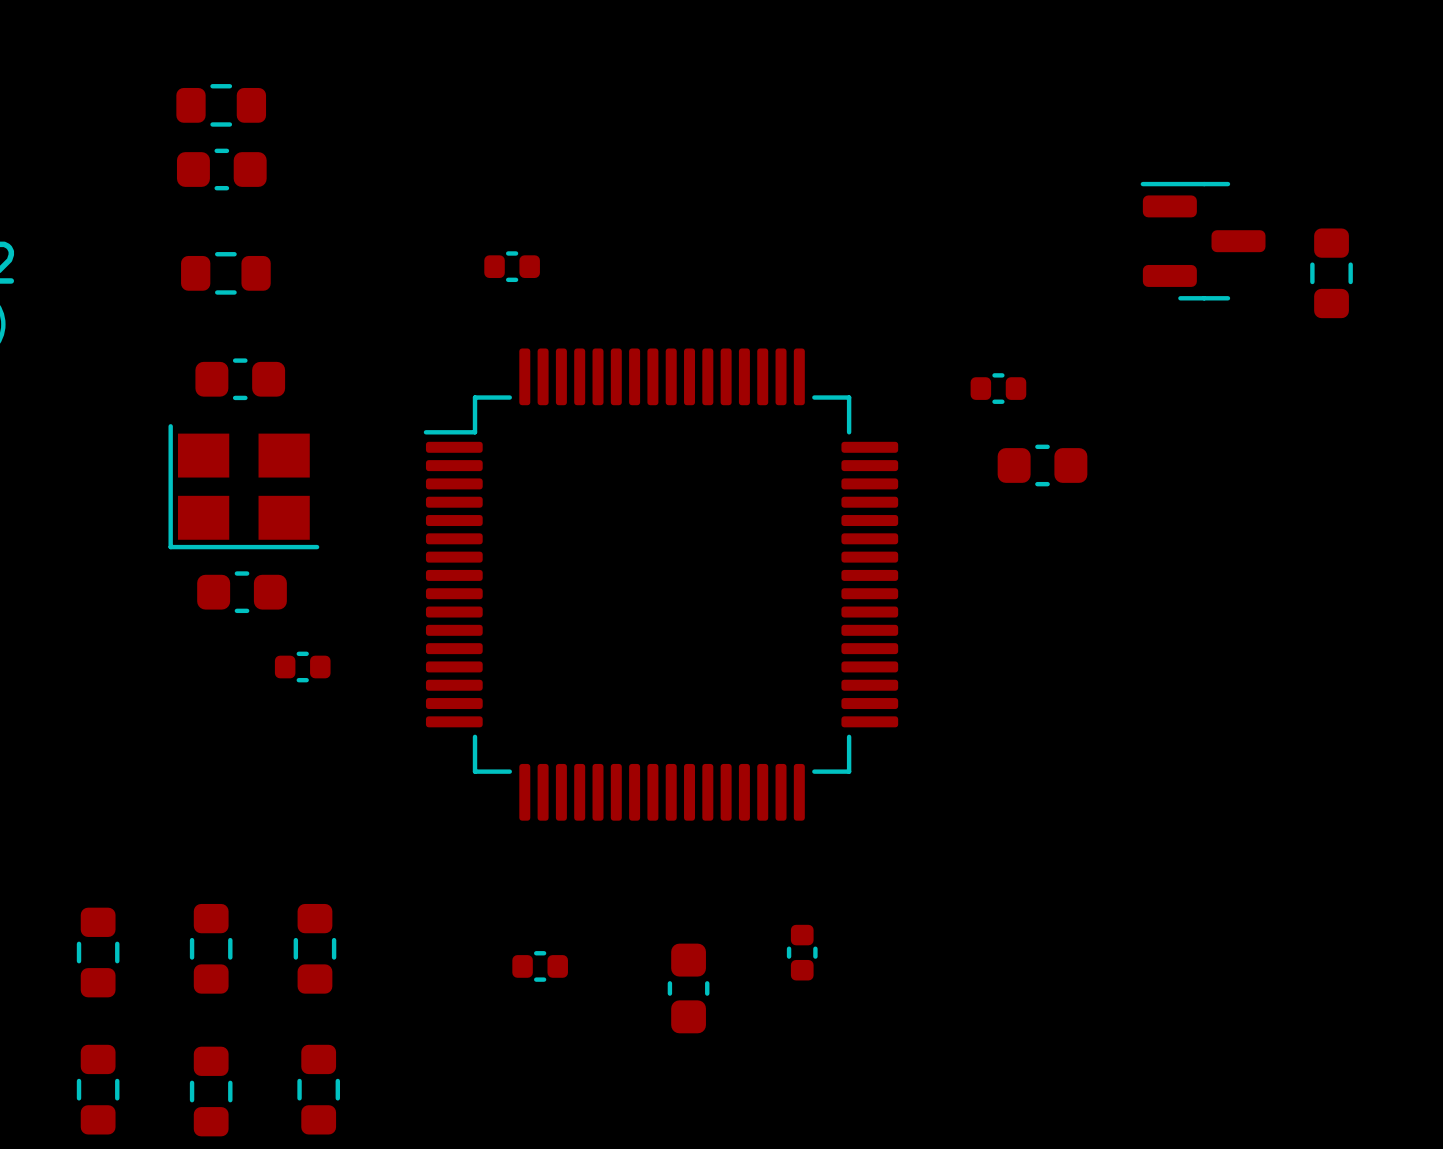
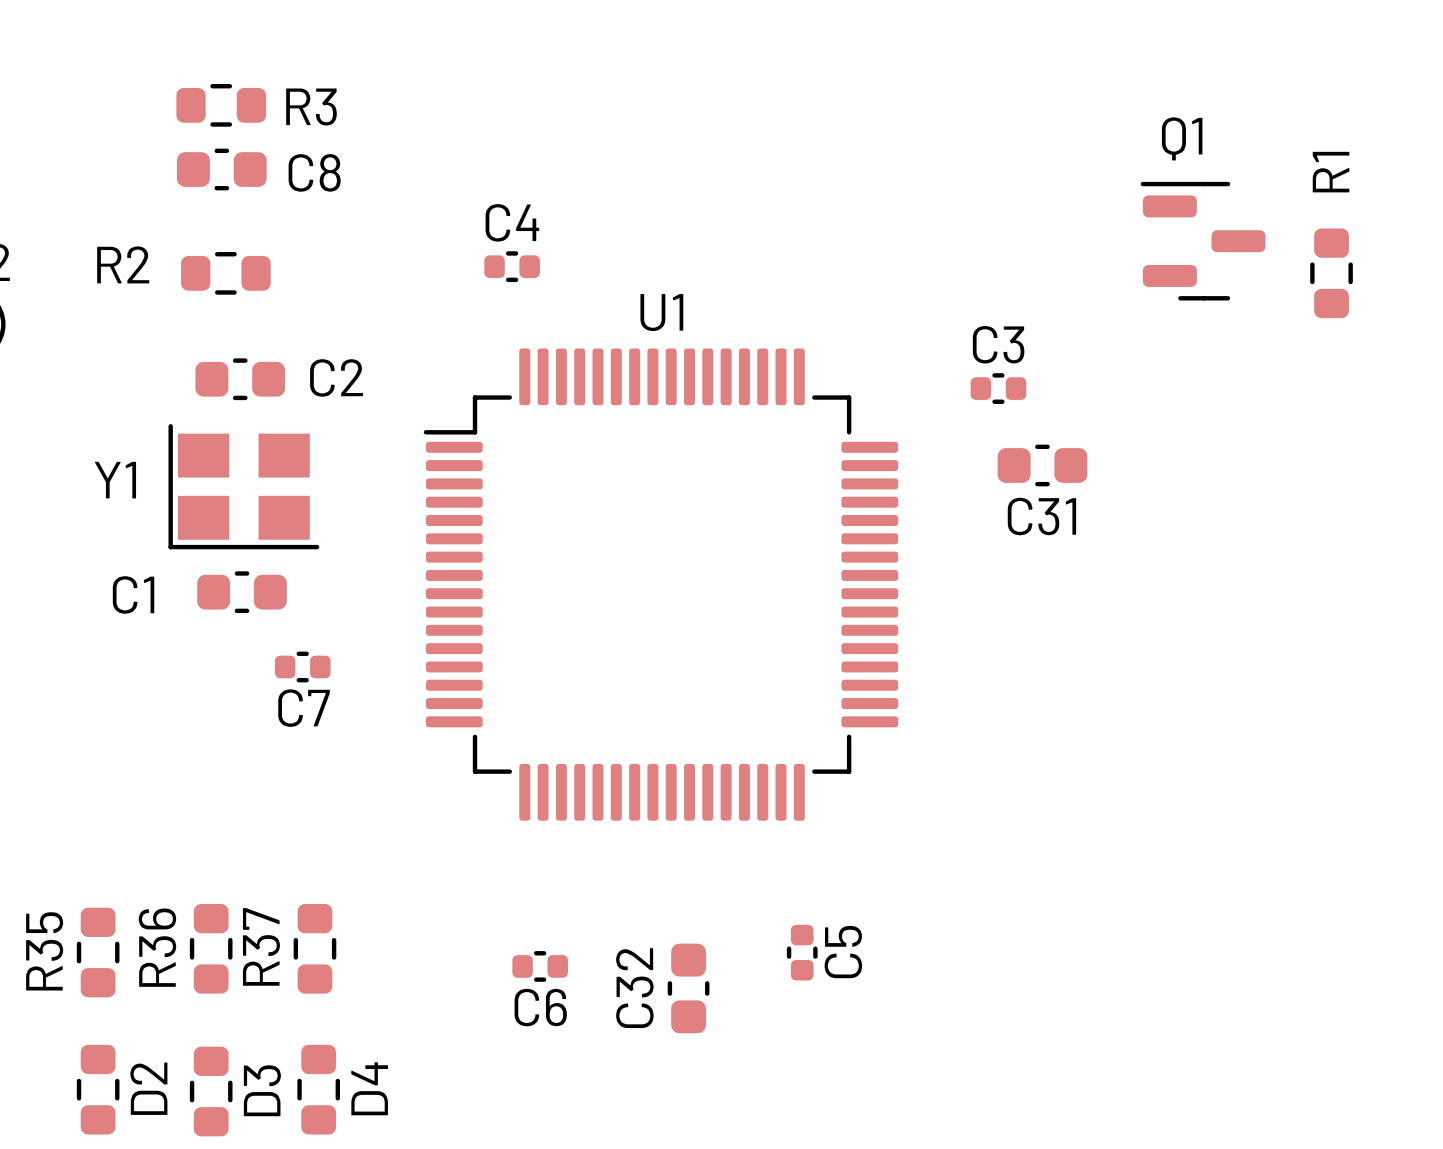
R3 name: none -> R3 (311, 107)
Q1 name: none -> Q1 (1182, 138)
R1 name: none -> R1 (1331, 172)
C8 name: none -> C8 (314, 172)
C4 name: none -> C4 (512, 222)
R2 name: none -> R2 (123, 264)
U1 name: none -> U1 (661, 312)
C3 name: none -> C3 (998, 344)
C2 name: none -> C2 (336, 377)
Y1 name: none -> Y1 (115, 480)
C31 name: none -> C31 (1041, 516)
C1 name: none -> C1 (133, 594)
C7 name: none -> C7 (304, 708)
R36 name: none -> R36 (157, 947)
R37 name: none -> R37 (261, 946)
R35 name: none -> R35 (44, 951)
C5 name: none -> C5 (843, 952)
C32 name: none -> C32 (634, 988)
C6 name: none -> C6 (540, 1007)
D4 name: none -> D4 (369, 1088)
D2 name: none -> D2 (148, 1088)
D3 name: none -> D3 (262, 1090)

